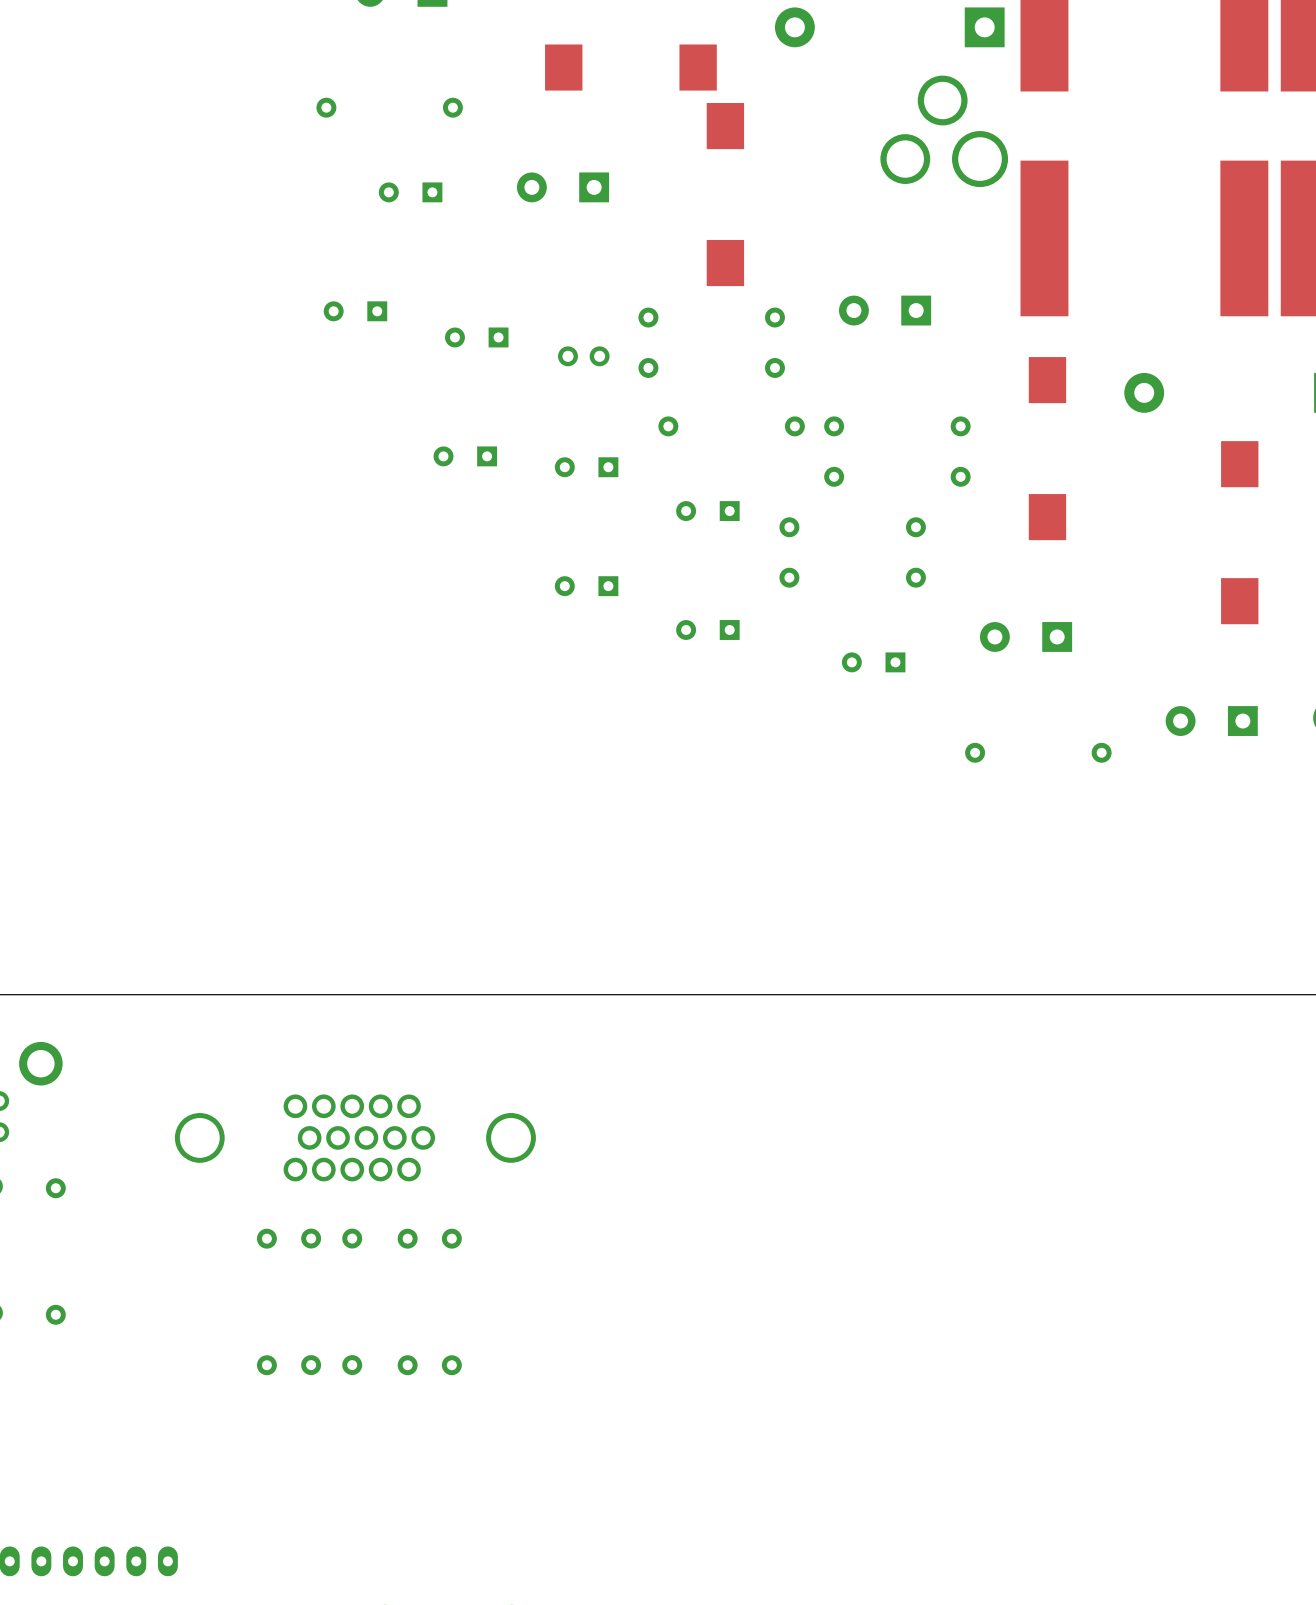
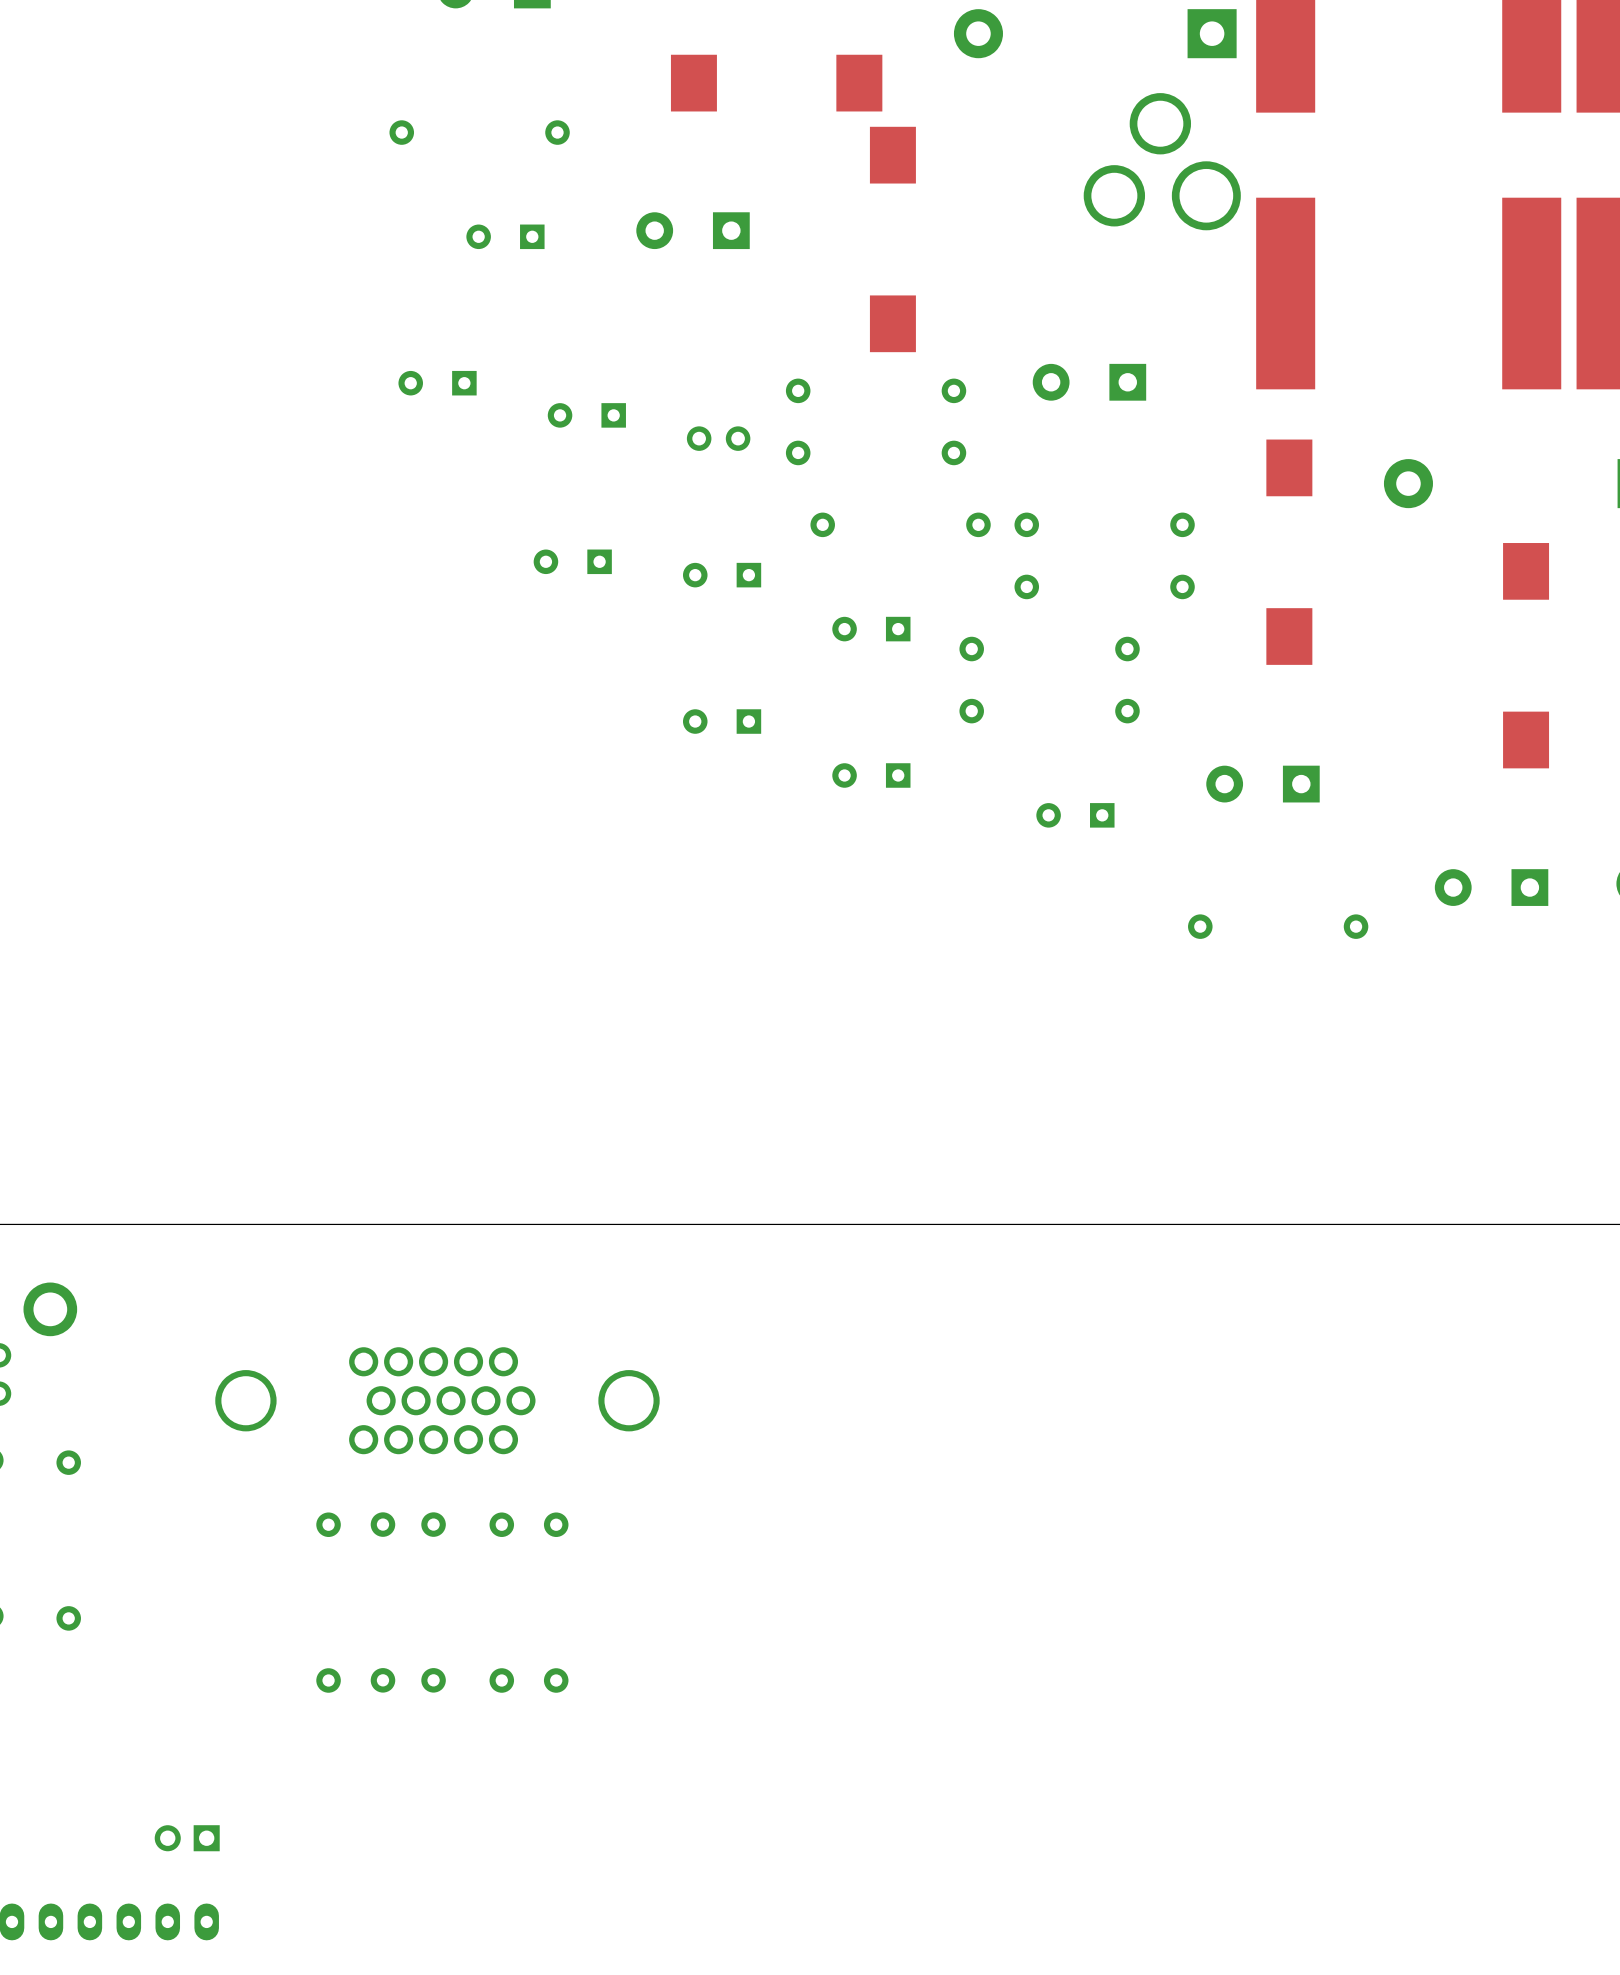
part: none -> (187, 1838)

